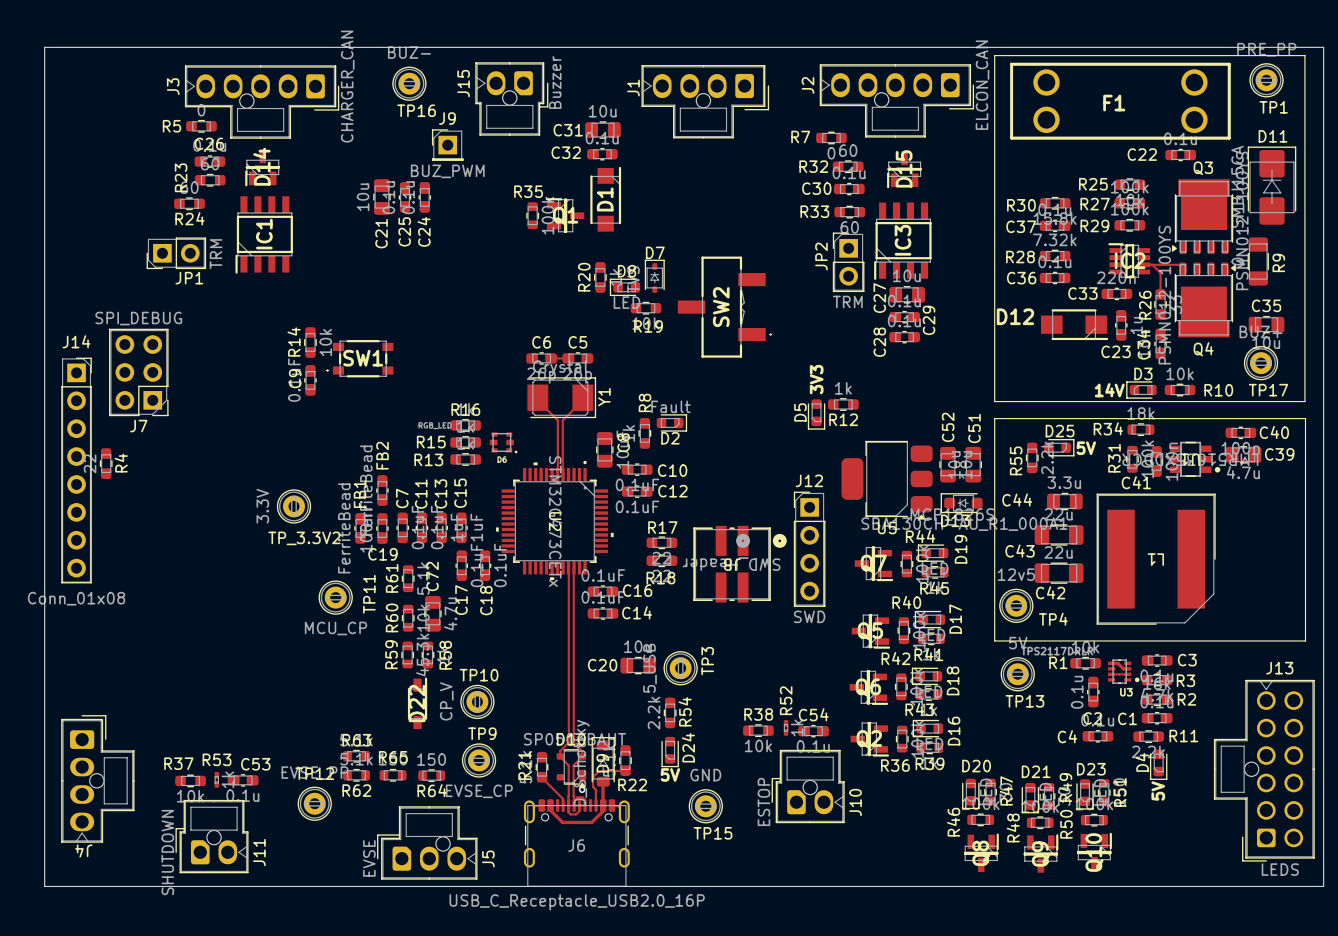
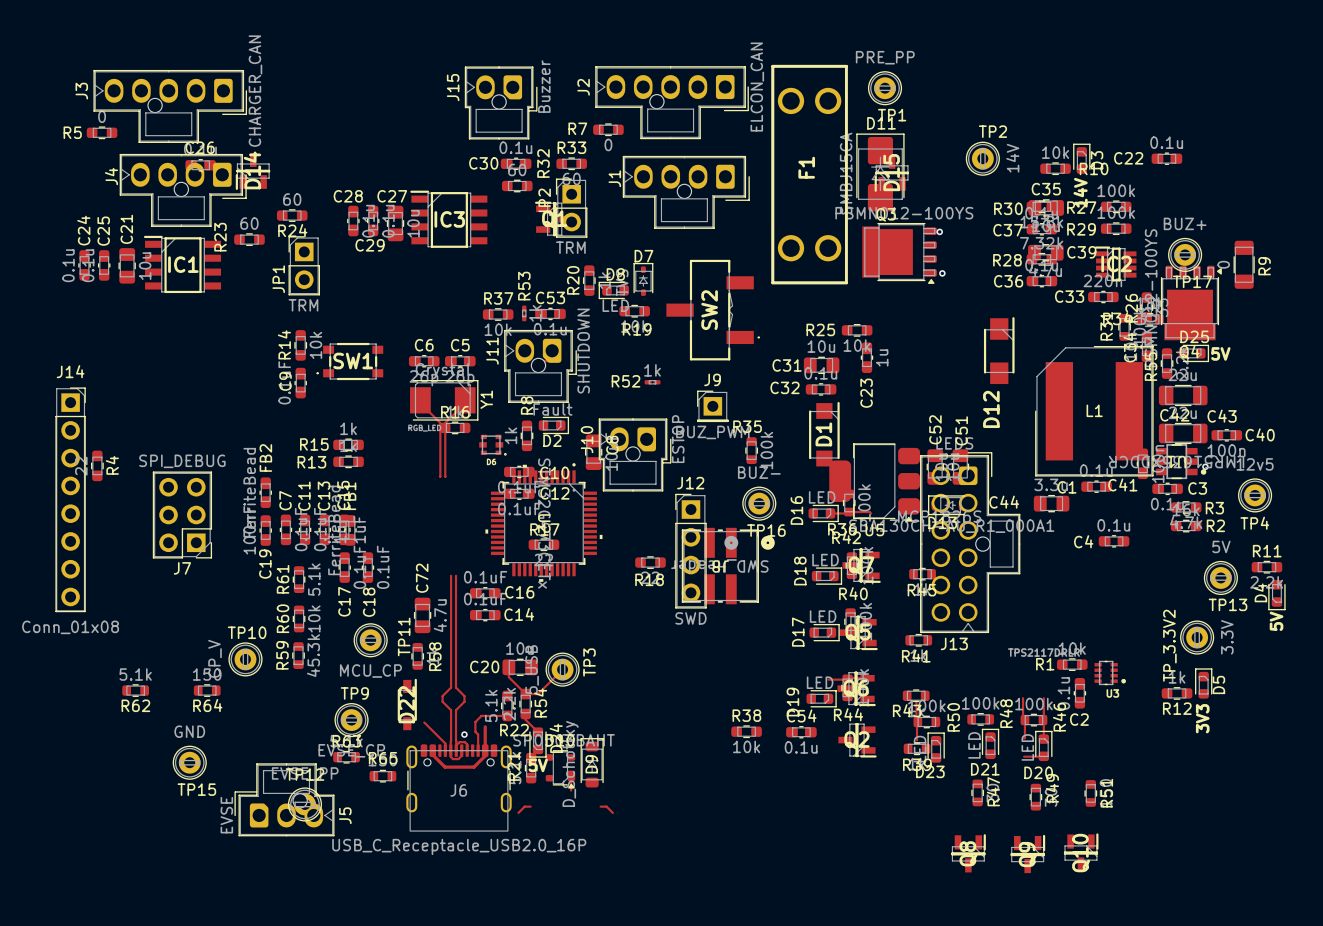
board edge: (44, 47) (1323, 47) (1323, 886) (44, 886) (44, 47) -> none
line: (994, 55) (1304, 55) (1304, 401) (994, 401) (994, 55) -> none
TP1 position: (1266, 80) -> (885, 88)
TP16 position: (409, 83) -> (759, 503)
J2 position: (896, 100) -> (672, 102)
J1 position: (705, 101) -> (686, 192)
F1 rotation: 0° (1120, 101) -> 90° clockwise (809, 174)
F1 position: (1120, 101) -> (809, 174)
J3 position: (262, 102) -> (170, 106)
R5 position: (201, 126) -> (102, 132)
C31 position: (602, 130) -> (821, 365)
R7 position: (831, 137) -> (608, 129)
J9 position: (447, 145) -> (712, 406)
C32 position: (602, 154) -> (821, 389)
TP2: none -> 14V (982, 158)
R32 name rotation: 0° (813, 166) -> 90° counterclockwise (543, 163)
R32 name position: R32 (813, 166) -> R32 (543, 163)
R32 position: (848, 166) -> (517, 186)
R23 position: (210, 180) -> (249, 239)
R25 position: (1129, 184) -> (857, 330)
D11 position: (1272, 185) -> (880, 172)
C30 position: (849, 189) -> (516, 163)
C21 value position: 10u (363, 197) -> 10u (145, 266)
C21 position: (381, 197) -> (127, 265)
C25 position: (405, 197) -> (104, 265)
C24 position: (424, 197) -> (84, 265)
D1 position: (605, 199) -> (824, 434)
R24 position: (189, 203) -> (292, 215)
R33 name position: R33 (814, 211) -> R33 (571, 147)
R33 position: (849, 212) -> (571, 163)
R35 position: (532, 215) -> (751, 450)
Q3 rotation: 0° (1202, 216) -> 90° counterclockwise (899, 253)
Q3 position: (1202, 216) -> (899, 253)
via: none -> (939, 231)
C25 name position: C25 (404, 231) -> C25 (103, 231)
C24 name position: C24 (424, 231) -> C24 (83, 230)
C21 name position: C21 (381, 233) -> C21 (126, 229)
IC1 rotation: 0° (264, 234) -> 90° clockwise (182, 264)
IC1 position: (264, 234) -> (182, 264)
IC3 rotation: 0° (902, 241) -> 90° clockwise (448, 219)
IC3 position: (902, 241) -> (448, 219)
JP1 rotation: 0° (176, 253) -> 90° clockwise (304, 265)
JP1 position: (176, 253) -> (304, 265)
JP2 position: (848, 262) -> (571, 208)
track: (1143, 264) (1178, 264) (1182, 268) -> none
track: (1152, 264) (1160, 273) (1160, 294) -> none
via: none -> (942, 273)
C27 rotation: 0° (907, 294) -> 90° clockwise (395, 223)
C27 position: (907, 294) -> (395, 223)
C29 rotation: 0° (904, 317) -> 90° clockwise (373, 221)
C29 position: (904, 317) -> (373, 221)
D12 rotation: 0° (1074, 324) -> 90° counterclockwise (999, 350)
D12 position: (1074, 324) -> (999, 350)
C35 position: (1266, 324) -> (1046, 207)
C23 position: (1121, 325) -> (866, 357)
C28 rotation: 0° (904, 337) -> 90° clockwise (353, 221)
C28 position: (904, 337) -> (353, 221)
C23 name rotation: 0° (1116, 351) -> 90° counterclockwise (866, 393)
C6 position: (541, 358) -> (424, 361)
C5 position: (577, 358) -> (460, 361)
TP17 position: (1261, 363) -> (1185, 254)
J7 position: (138, 372) -> (182, 515)
D3 value position: 14V (1109, 390) -> 14V (1080, 192)
D3 rotation: 0° (1141, 390) -> 90° clockwise (1081, 158)
D3 position: (1141, 390) -> (1081, 158)
R10 position: (1180, 390) -> (1055, 168)
track: (537, 397) (537, 400) (557, 420) (557, 474) -> (420, 400) (420, 403) (440, 423) (440, 476)
Y1 position: (561, 397) -> (444, 400)
track: (582, 397) (582, 400) (562, 420) (563, 474) -> (465, 400) (465, 403) (445, 423) (445, 476)
R12 position: (843, 404) -> (1177, 693)
D5 rotation: 0° (816, 414) -> 180° (1203, 683)
D5 position: (816, 414) -> (1203, 683)
line: (994, 418) (994, 640) (1305, 640) (1305, 418) (994, 418) -> none
D2 position: (671, 422) -> (553, 425)
R34 position: (1140, 429) -> (1150, 319)
R8 position: (644, 433) -> (527, 435)
R15 position: (465, 442) -> (348, 444)
D25 position: (1059, 447) -> (1193, 353)
C39 position: (1243, 454) -> (1045, 252)
R55 position: (1032, 457) -> (1167, 363)
R13 position: (465, 459) -> (348, 461)
R31 position: (1132, 459) -> (1124, 327)
via: none -> (1205, 466)
C10 position: (637, 469) -> (519, 471)
J14 position: (76, 470) -> (70, 499)
FB2 position: (382, 490) -> (265, 492)
C12 position: (637, 491) -> (519, 493)
TP_3.3V2 value position: 3.3V (262, 506) -> 3.3V (1227, 637)
TP_3.3V2 position: (293, 506) -> (1197, 637)
track: none -> (830, 513) (871, 513)
C7 position: (402, 527) -> (285, 529)
C11 position: (421, 527) -> (305, 529)
C13 position: (441, 527) -> (324, 529)
C15 position: (461, 527) -> (344, 529)
C19 position: (382, 528) -> (265, 530)
C43 position: (1059, 534) -> (1183, 433)
R44 name position: R44 (920, 536) -> R44 (848, 714)
TP_3.3V2 name rotation: 0° (304, 538) -> 90° counterclockwise (1169, 645)
R17 position: (661, 542) -> (543, 544)
J12 position: (809, 549) -> (690, 551)
C43 name position: C43 (1020, 551) -> C43 (1222, 416)
D19 rotation: 0° (933, 553) -> 180° (821, 698)
D19 position: (933, 553) -> (821, 698)
C19 name rotation: 0° (382, 554) -> 90° counterclockwise (265, 564)
L1 rotation: 0° (1156, 559) -> 180° (1094, 411)
L1 position: (1156, 559) -> (1094, 411)
R44 position: (906, 564) -> (847, 687)
C17 position: (461, 565) -> (344, 567)
C18 position: (485, 565) -> (367, 567)
track: (568, 567) (568, 737) -> none
track: (574, 567) (573, 739) -> none
track: none -> (451, 575) (451, 687) (442, 696) (442, 701)
track: none -> (455, 575) (455, 687) (464, 696) (464, 701)
C42 position: (1059, 573) -> (1183, 395)
R61 position: (408, 578) -> (299, 579)
C16 position: (603, 591) -> (485, 593)
TP11 position: (335, 597) -> (370, 640)
TP4 position: (1016, 605) -> (1255, 495)
C14 position: (603, 613) -> (485, 615)
R60 position: (408, 618) -> (299, 618)
D17 rotation: 0° (930, 619) -> 180° (824, 632)
D17 position: (930, 619) -> (824, 632)
TP4 name position: TP4 (1053, 619) -> TP4 (1254, 523)
R40 position: (903, 630) -> (850, 621)
R59 position: (407, 654) -> (298, 655)
C3 position: (1157, 660) -> (1167, 488)
track: (1111, 663) (1117, 663) (1123, 668) (1127, 668) -> none
track: none -> (508, 667) (508, 677) (525, 694) (538, 694) (562, 669)
C20 position: (638, 665) -> (520, 667)
TP3 position: (680, 668) -> (562, 669)
TP13 position: (1017, 674) -> (1220, 577)
track: (1111, 674) (1127, 674) -> none
track: none -> (869, 677) (828, 679)
D18 rotation: 0° (927, 676) -> 180° (827, 576)
D18 position: (927, 676) -> (827, 576)
R3 position: (1157, 680) -> (1186, 507)
R42 position: (901, 686) -> (851, 565)
track: none -> (1023, 698) (1024, 738)
track: none -> (1043, 698) (1043, 739)
R2 position: (1157, 699) -> (1186, 526)
track: none -> (442, 701) (451, 710) (450, 756) (458, 759) (461, 755) (461, 750)
R52 name position: R52 (786, 700) -> R52 (626, 381)
track: none -> (916, 701) (917, 740)
TP10 position: (477, 701) -> (245, 659)
track: none -> (525, 714) (525, 719) (537, 732)
R54 position: (670, 712) -> (525, 704)
C1 position: (1157, 718) -> (1096, 486)
R52 rotation: 0° (786, 727) -> 90° clockwise (652, 382)
R52 position: (786, 727) -> (652, 382)
D16 rotation: 0° (927, 728) -> 180° (823, 513)
D16 position: (927, 728) -> (823, 513)
via: none -> (464, 734)
R11 name position: R11 (1183, 735) -> R11 (1267, 551)
C4 position: (1097, 736) -> (1114, 541)
R11 position: (1148, 736) -> (1266, 567)
track: (568, 737) (568, 742) (560, 751) (560, 756) (568, 765) (568, 812) (576, 814) (579, 811) (579, 805) -> none
track: (573, 739) (573, 742) (582, 751) (582, 756) -> none
R36 position: (902, 739) -> (849, 503)
D24 position: (670, 752) -> (537, 742)
track: none -> (1043, 756) (1024, 756)
track: (582, 756) (573, 765) (573, 805) -> (464, 701) (455, 710) (456, 750)
R53 name rotation: 0° (217, 759) -> 90° counterclockwise (524, 286)
TP9 position: (479, 760) -> (351, 720)
R22 position: (625, 760) -> (507, 705)
R37 name position: R37 (178, 763) -> R37 (498, 298)
C53 name position: C53 (255, 764) -> C53 (550, 297)
D4 position: (1158, 764) -> (1276, 595)
J13 rotation: 0° (1264, 770) -> 180° (970, 542)
J13 position: (1264, 770) -> (970, 542)
track: (625, 771) (599, 771) (593, 777) (593, 787) (595, 789) (595, 805) -> (507, 715) (481, 715) (475, 722) (475, 731) (478, 734) (478, 750)
R62 position: (356, 775) -> (135, 690)
R64 position: (431, 775) -> (207, 690)
track: (541, 777) (562, 798) (562, 805) -> (424, 722) (445, 743) (445, 750)
J4 rotation: 0° (97, 778) -> 90° clockwise (183, 190)
J4 position: (97, 778) -> (183, 190)
R53 position: (216, 779) -> (524, 313)
R37 position: (190, 780) -> (498, 314)
C53 position: (243, 780) -> (550, 313)
track: (603, 782) (603, 811) (591, 822) (562, 822) (550, 810) (550, 805) -> (485, 726) (485, 755) (474, 767) (444, 767) (432, 754) (432, 750)
J10 rotation: 0° (808, 786) -> 180° (635, 454)
J10 position: (808, 786) -> (635, 454)
via: (582, 789) -> none
D20 rotation: 0° (970, 793) -> 180° (1043, 745)
D20 position: (970, 793) -> (1043, 745)
D23 rotation: 0° (1085, 794) -> 180° (936, 747)
D23 position: (1085, 794) -> (936, 747)
D21 rotation: 0° (1030, 798) -> 180° (990, 743)
D21 position: (1030, 798) -> (990, 743)
track: (573, 800) (577, 797) (582, 797) (584, 799) (584, 805) -> (456, 745) (459, 742) (465, 742) (467, 744) (467, 750)
TP15 position: (705, 806) -> (189, 762)
R46 position: (980, 819) -> (1033, 720)
R50 position: (1094, 820) -> (926, 721)
R46 name position: R46 (953, 822) -> R46 (1059, 717)
R48 position: (1040, 822) -> (980, 719)
R50 name position: R50 (1066, 824) -> R50 (953, 717)
R48 name position: R48 (1013, 827) -> R48 (1006, 713)
J11 rotation: 0° (212, 836) -> 180° (540, 366)
J11 position: (212, 836) -> (540, 366)
J5 position: (427, 842) -> (284, 799)
J6 position: (576, 843) -> (459, 787)

